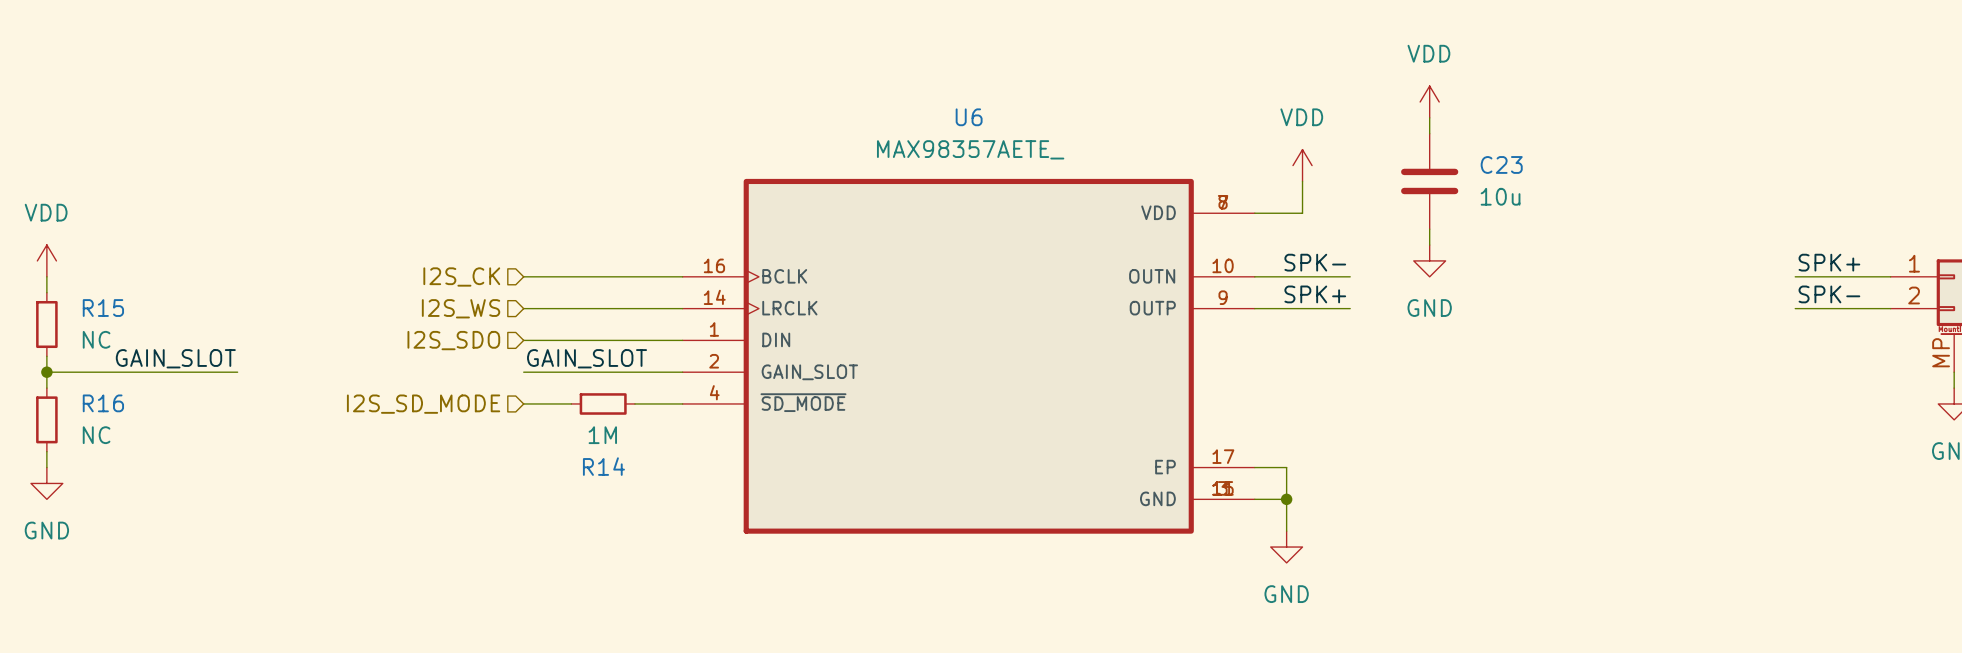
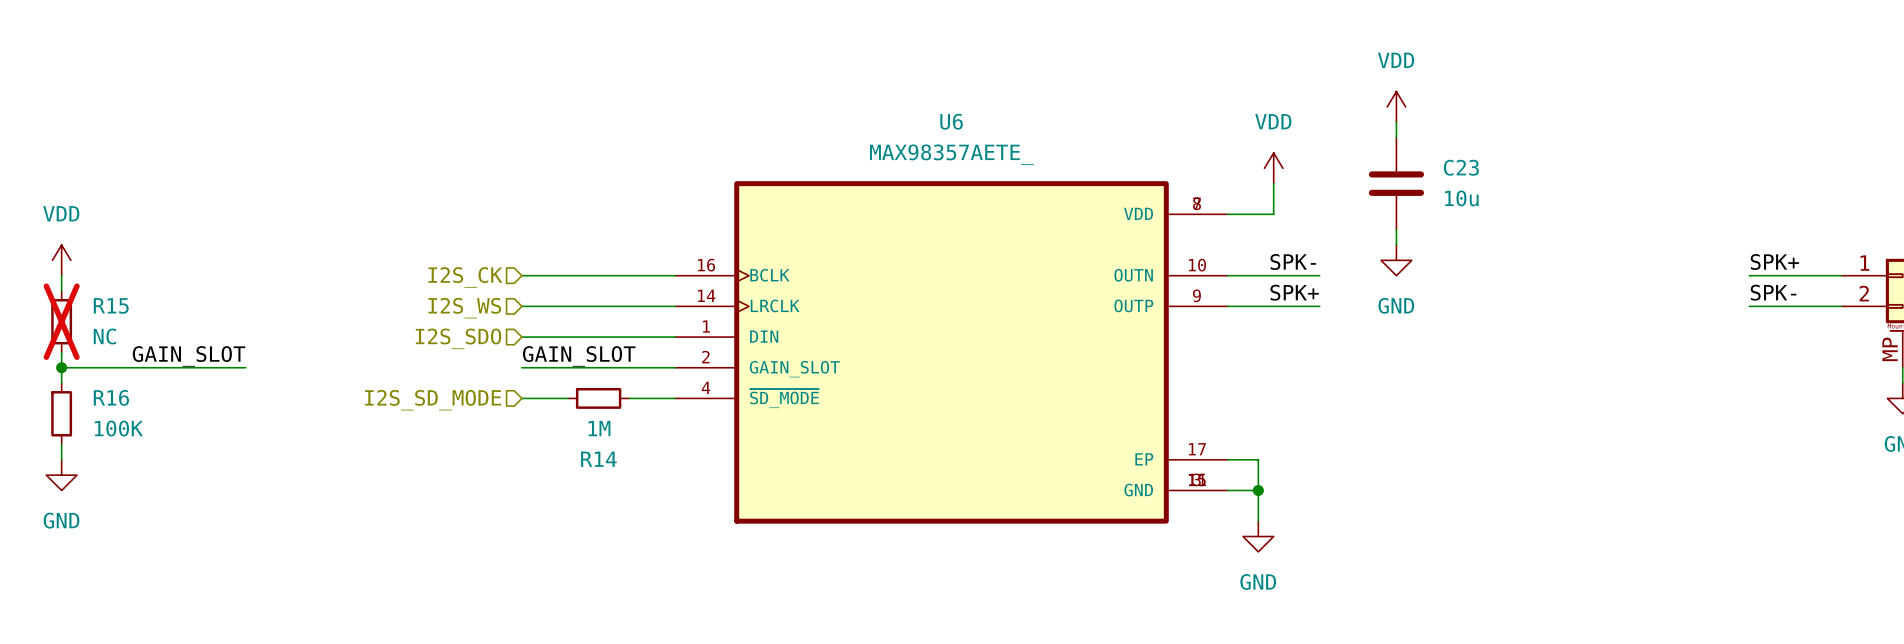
R15 do-not-place cross: none -> (61, 321)
R16 value: NC (96, 435) -> 100K (118, 428)

